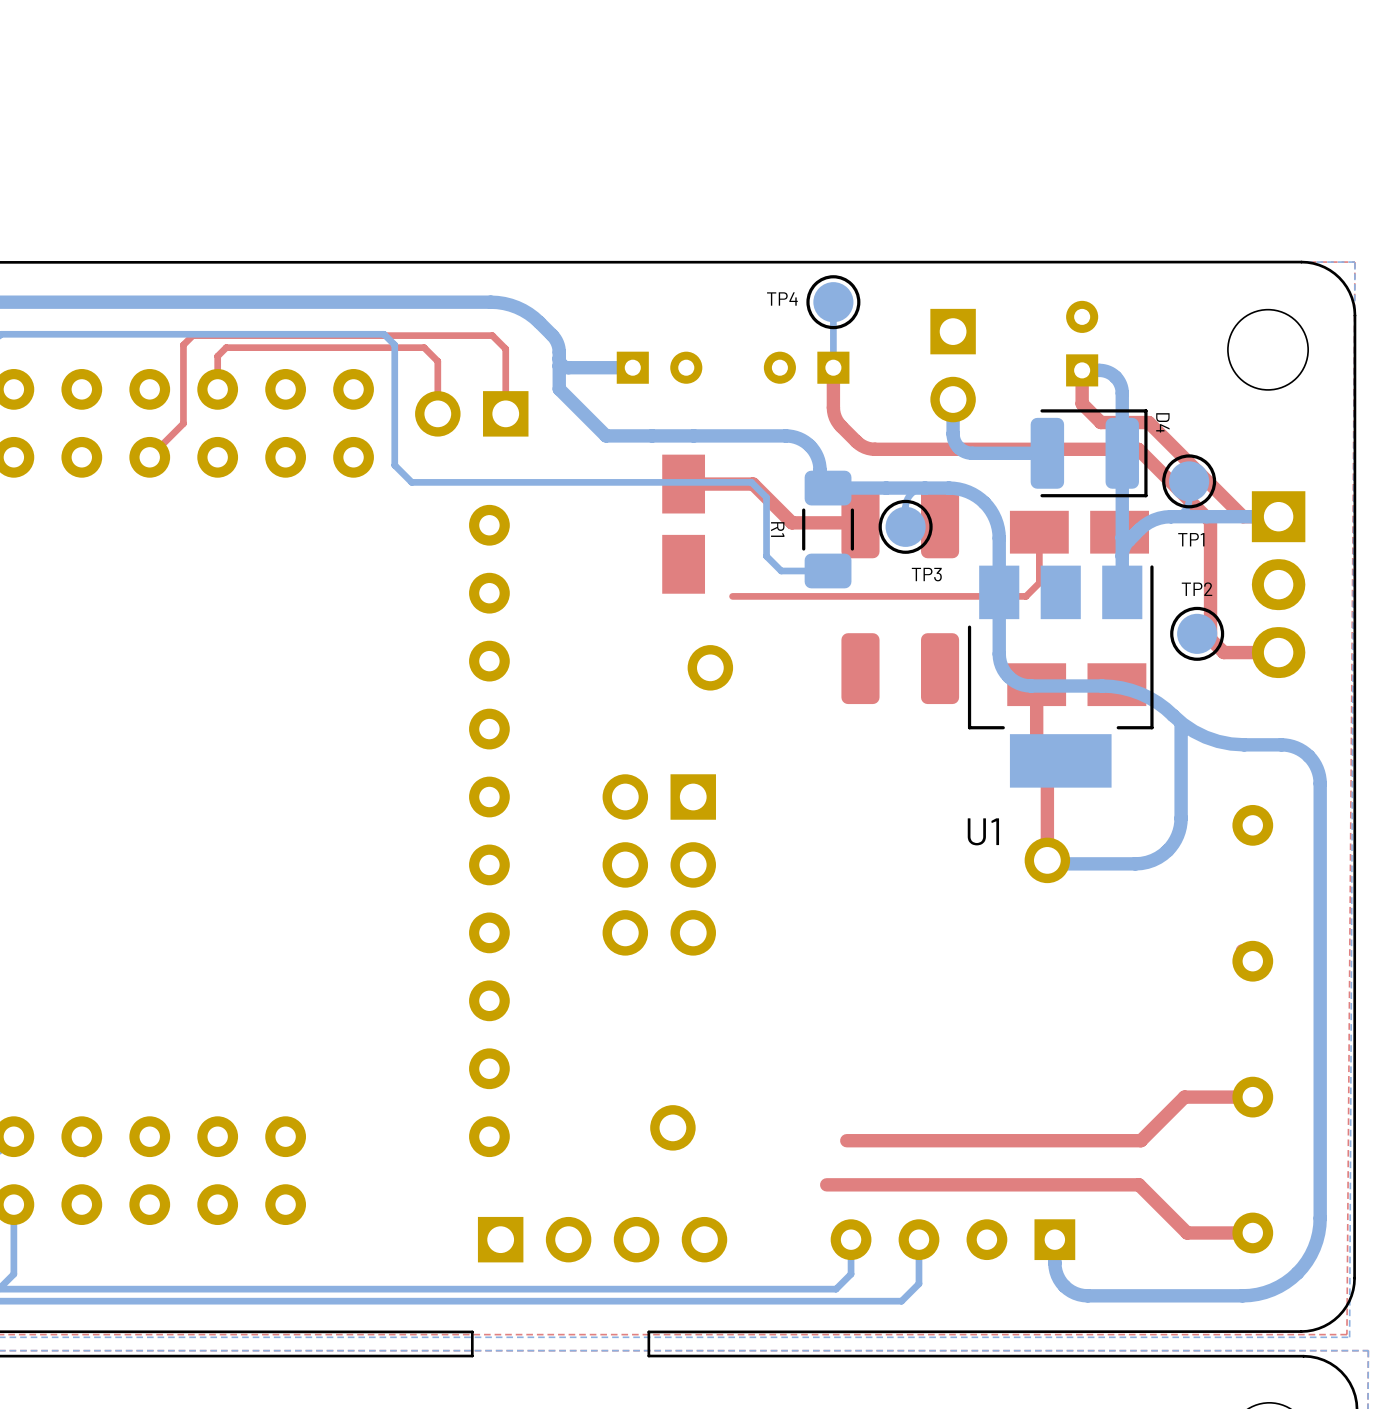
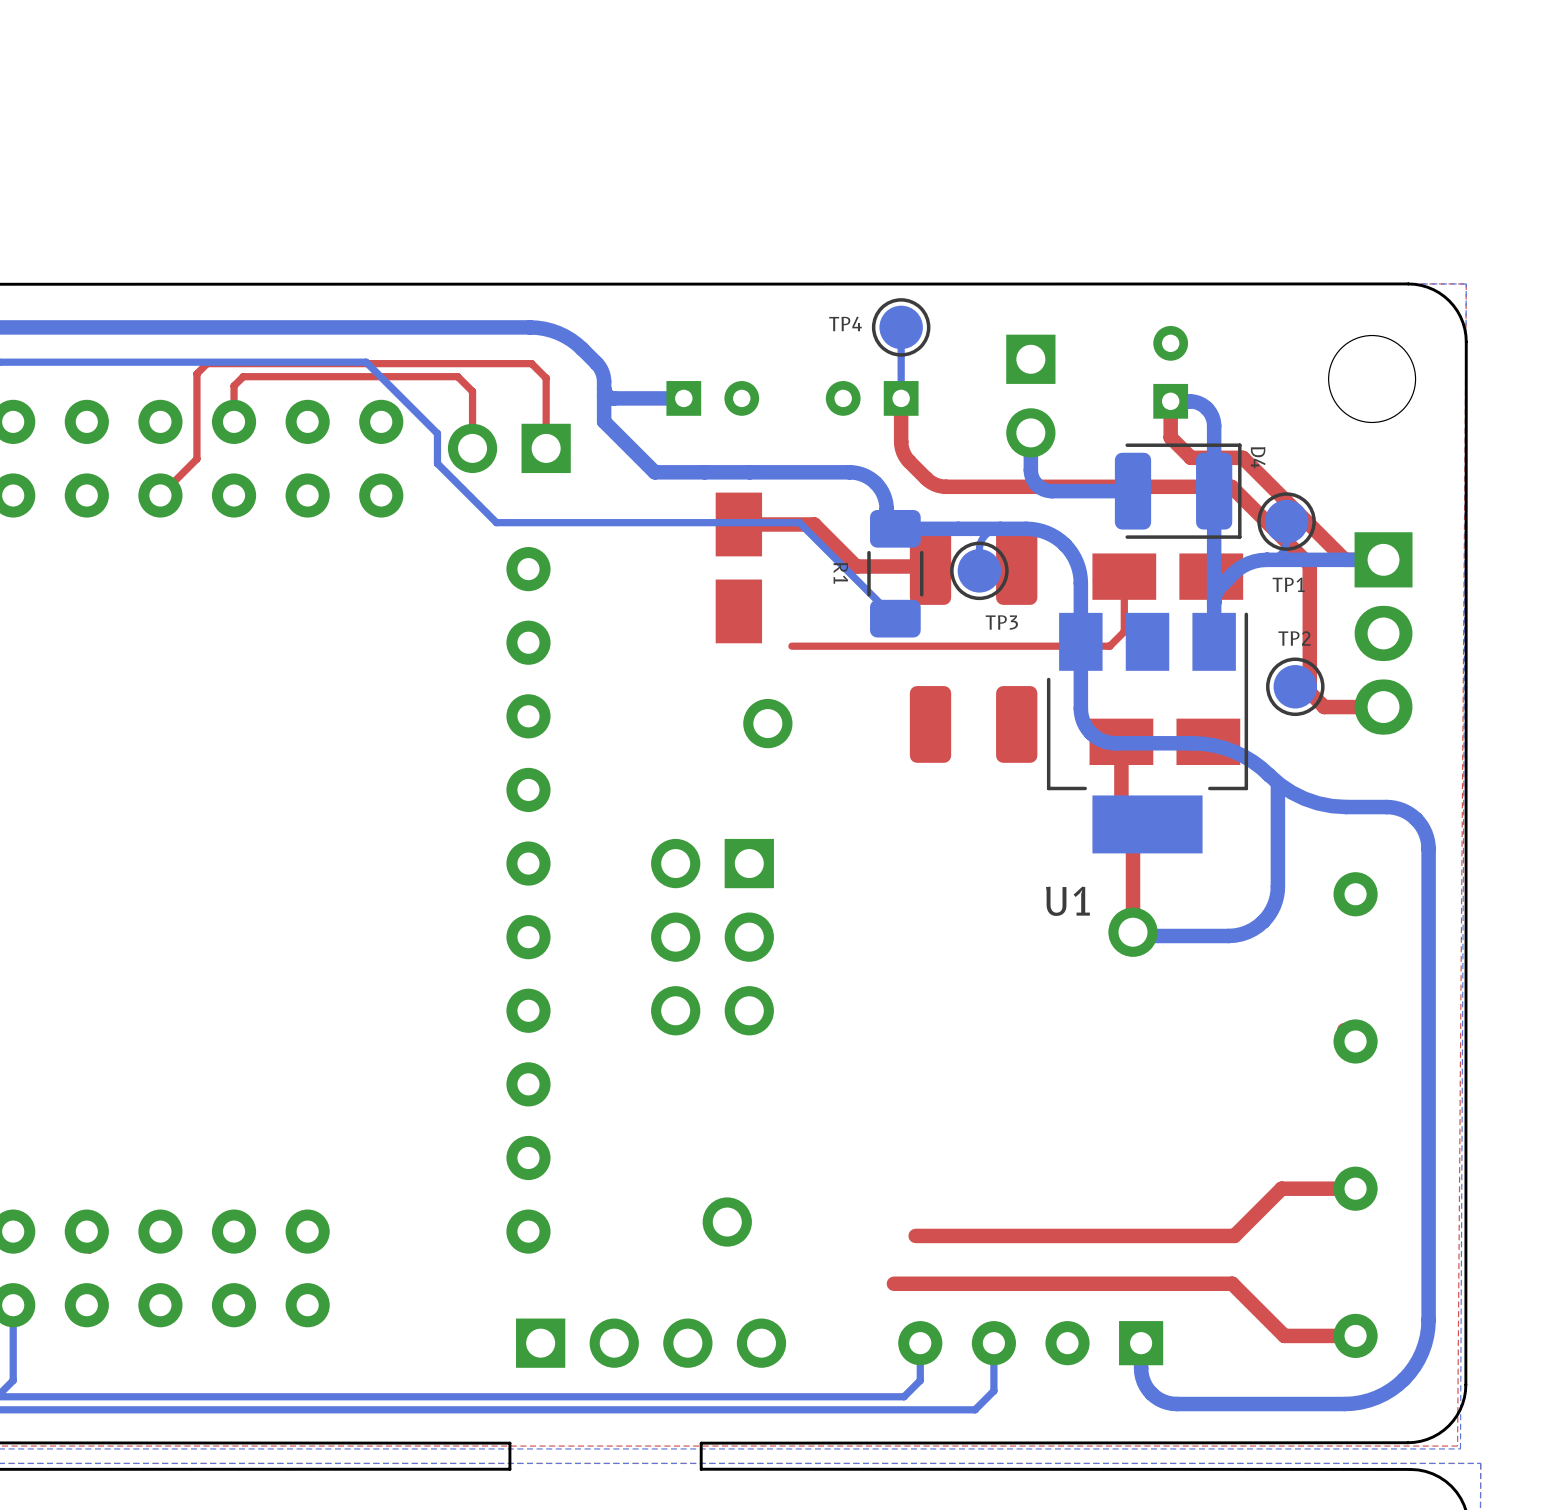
bottom track: (339, 334) (384, 334) (394, 344) (394, 465) (411, 482) (459, 482) -> (366, 362) (437, 433) (437, 463) (496, 522)
bottom track: (739, 482) (751, 482) (766, 497) (766, 556) (781, 570) (828, 570) -> (799, 522) (895, 618)

